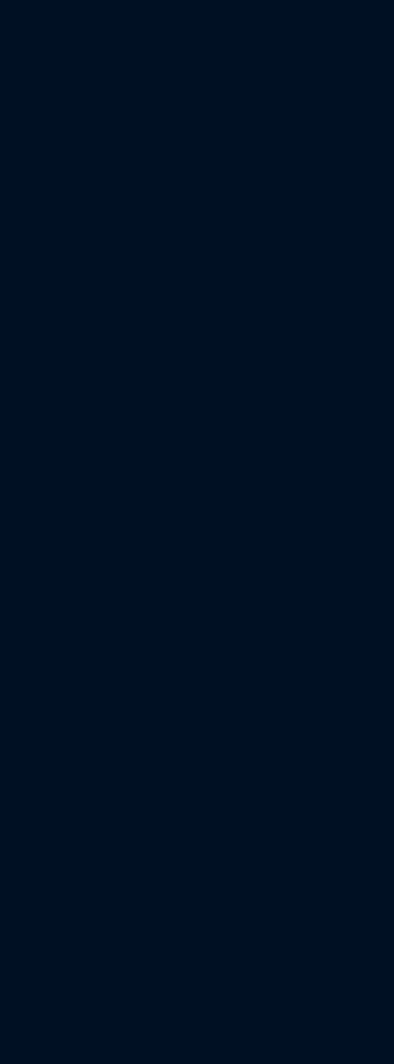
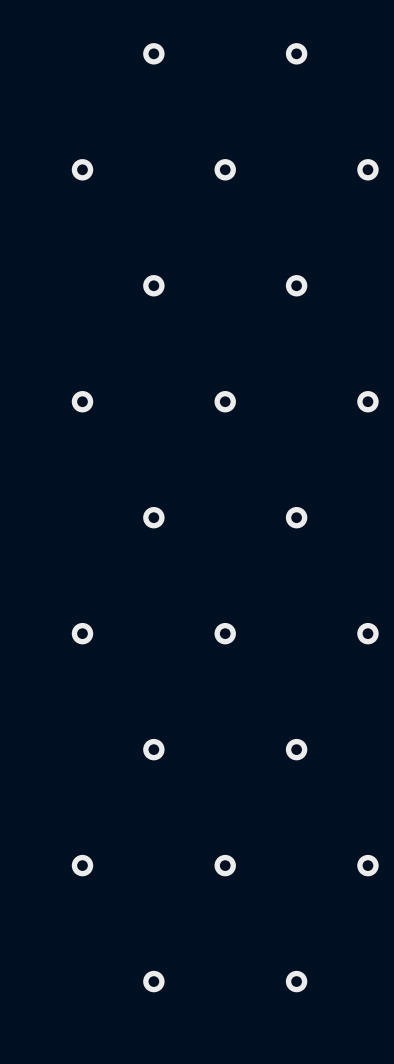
via: none -> (153, 53)
via: none -> (296, 53)
via: none -> (82, 169)
via: none -> (225, 169)
via: none -> (367, 169)
via: none -> (153, 285)
via: none -> (296, 285)
via: none -> (82, 401)
via: none -> (225, 401)
via: none -> (367, 401)
via: none -> (153, 517)
via: none -> (296, 517)
via: none -> (82, 633)
via: none -> (225, 633)
via: none -> (367, 633)
via: none -> (153, 749)
via: none -> (296, 749)
via: none -> (82, 865)
via: none -> (225, 865)
via: none -> (367, 865)
via: none -> (153, 981)
via: none -> (296, 981)

